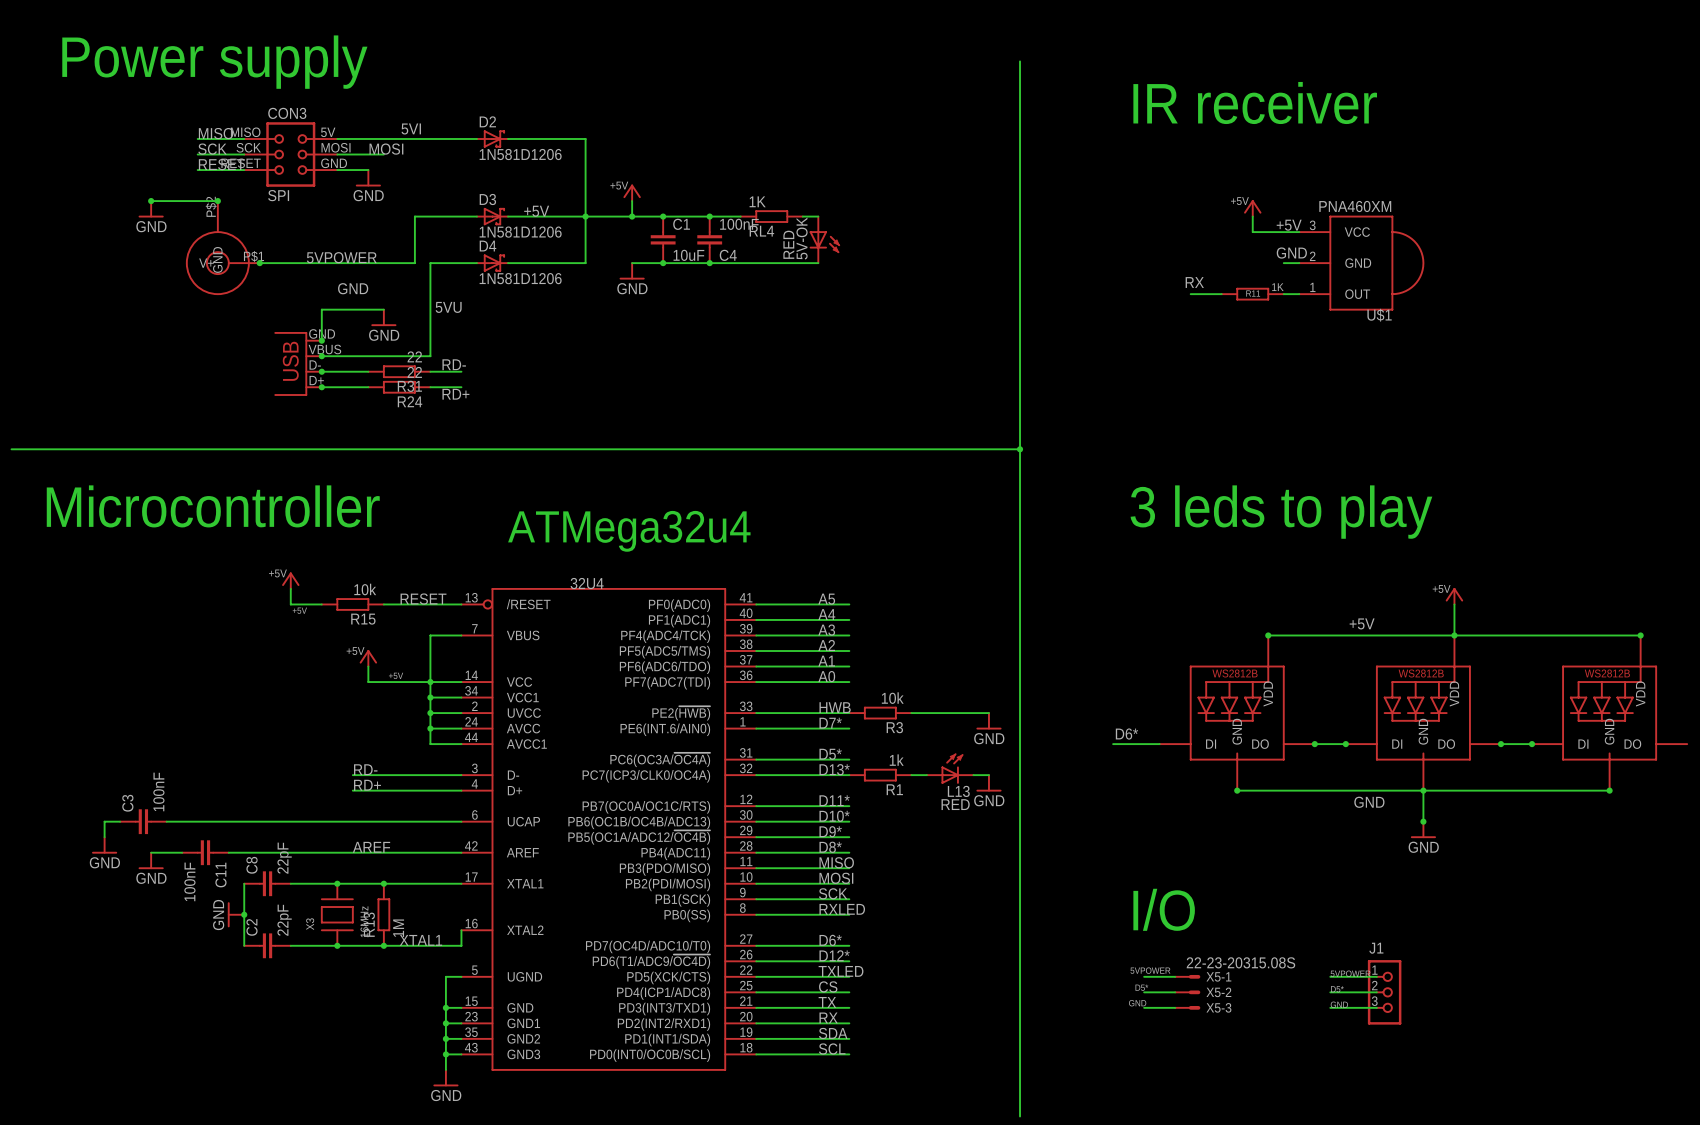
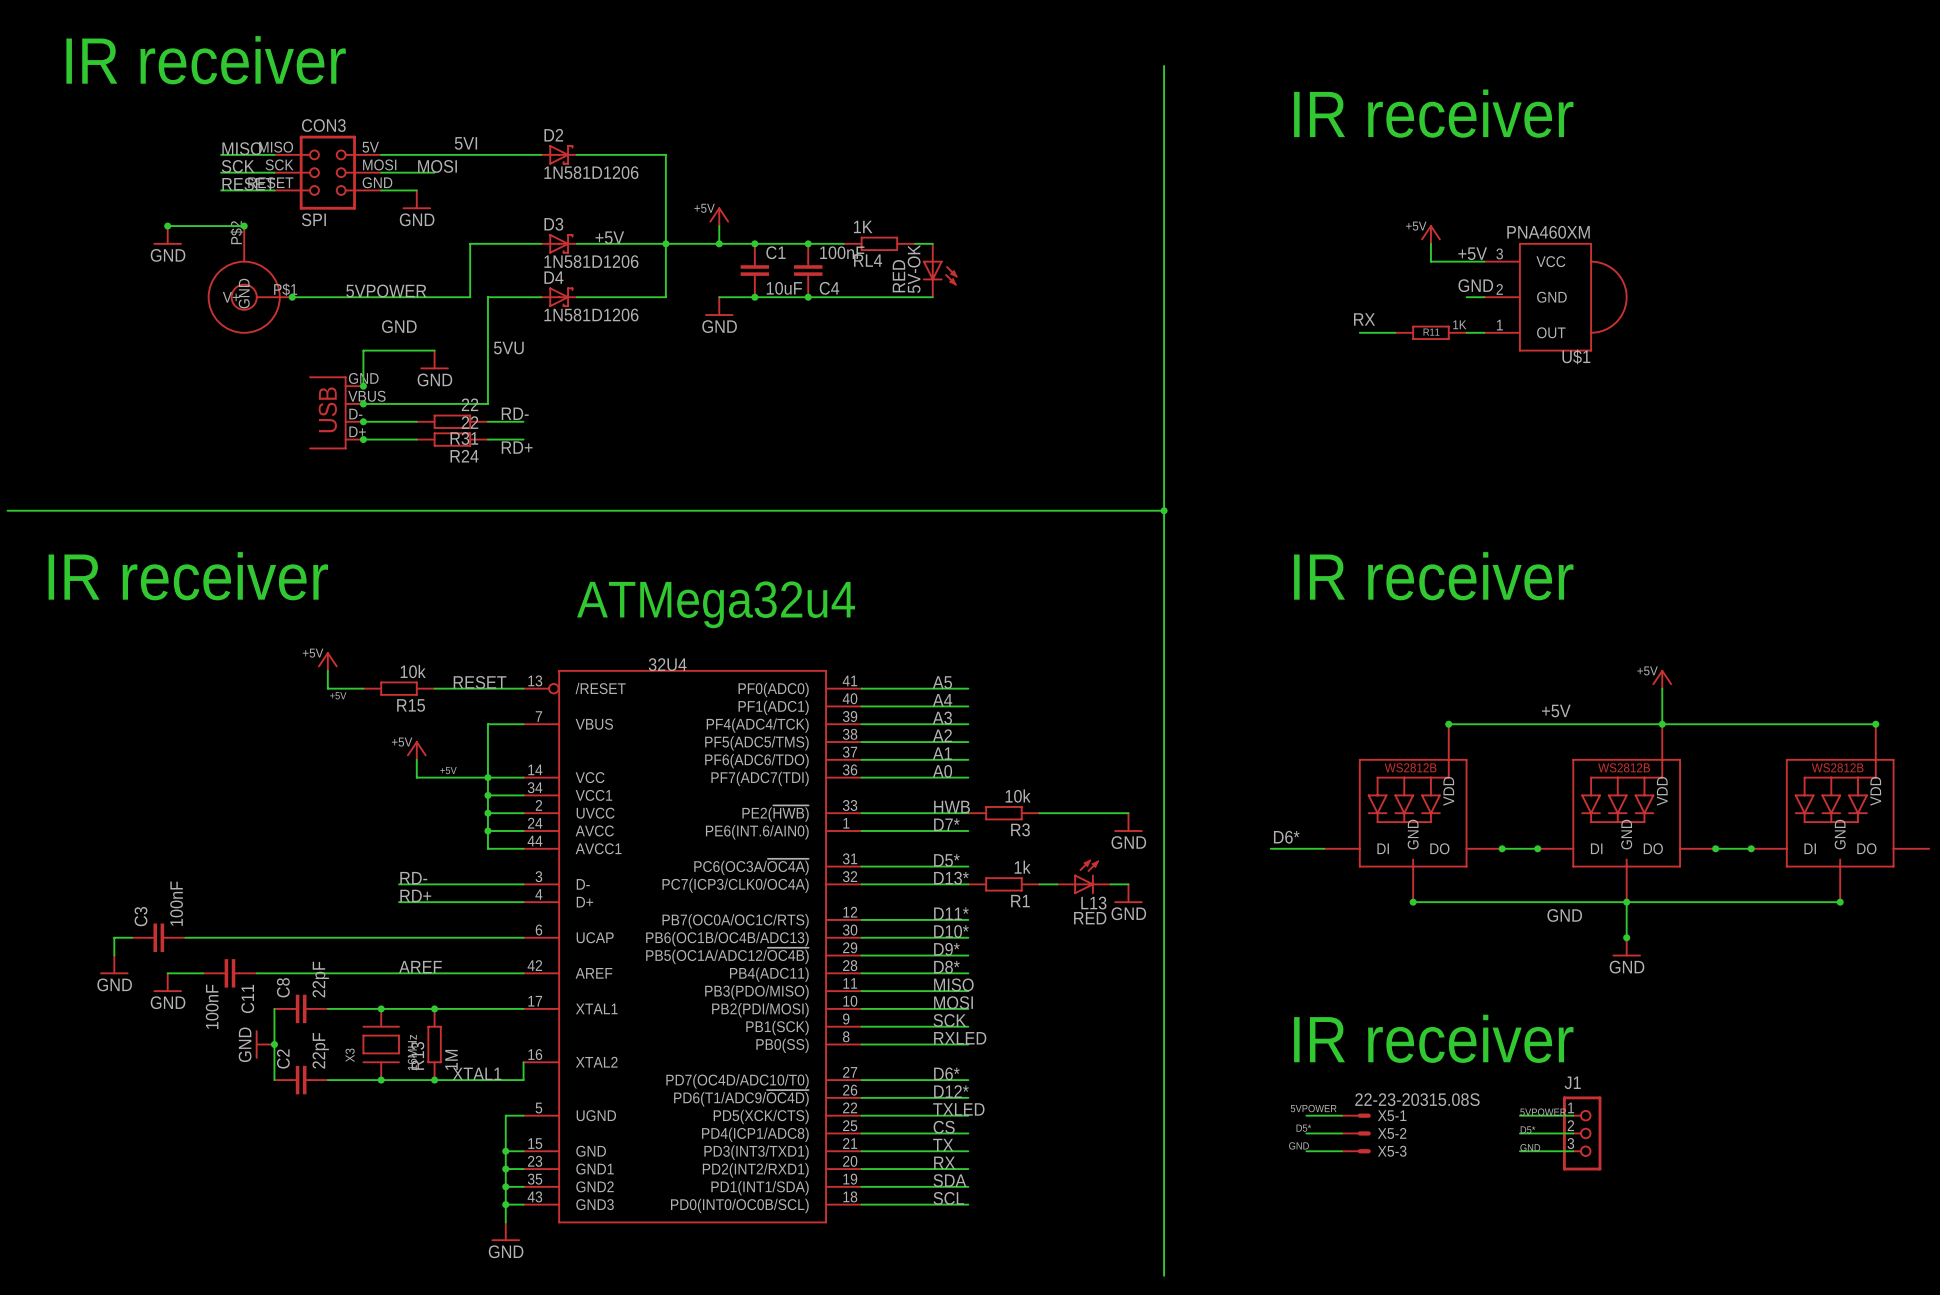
text: Power supply (214, 62) -> IR receiver (206, 60)
text: Microcontroller (213, 506) -> IR receiver (188, 576)
text: 3 leds to play (1281, 512) -> IR receiver (1433, 576)
text: I/O (1164, 909) -> IR receiver (1433, 1038)

